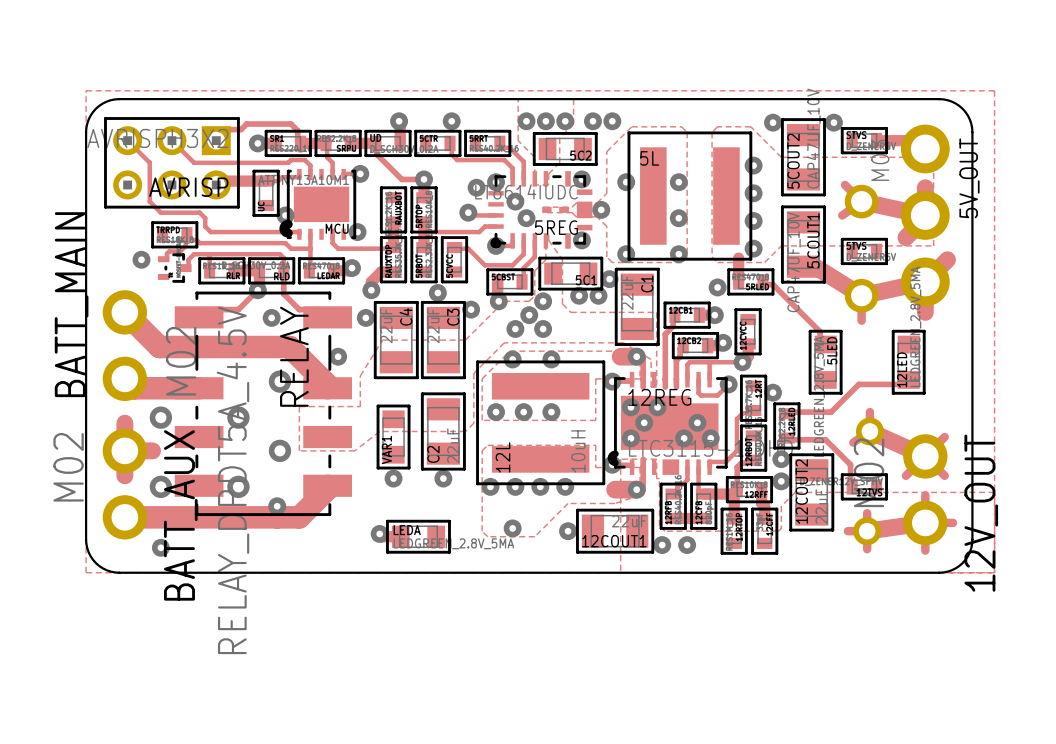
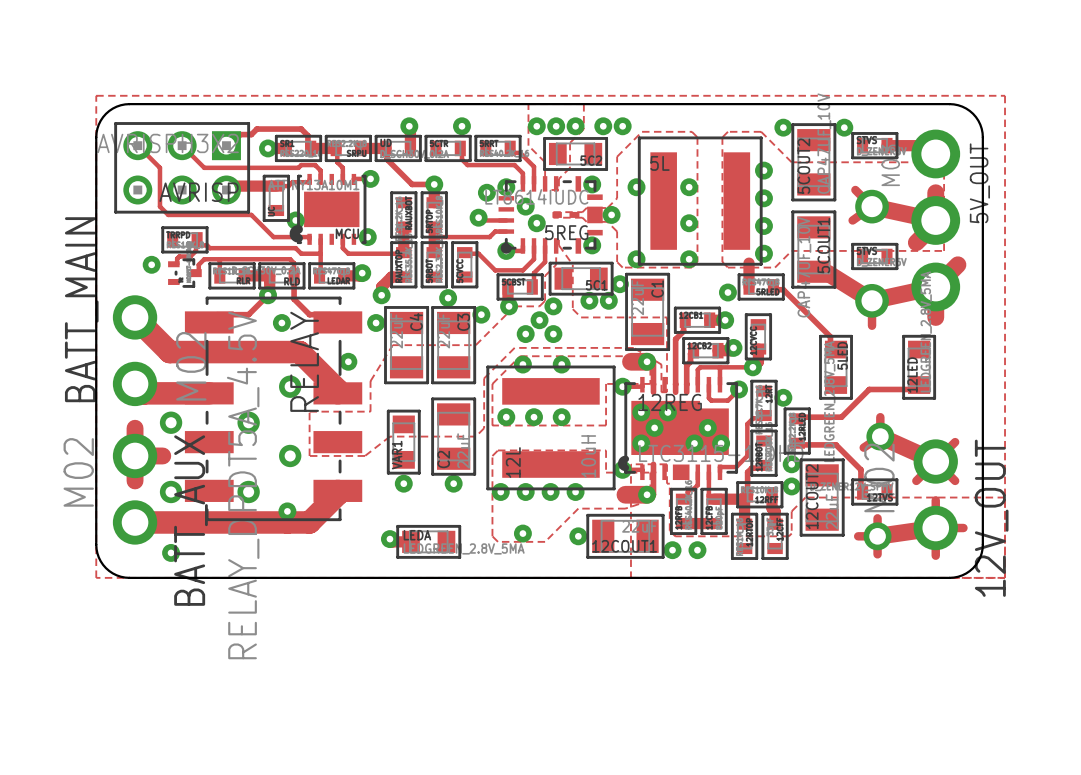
track: (158, 209) (160, 212) (199, 212) (205, 218) (205, 226) (210, 232) (263, 232) -> (168, 214) (251, 214) (273, 237)

